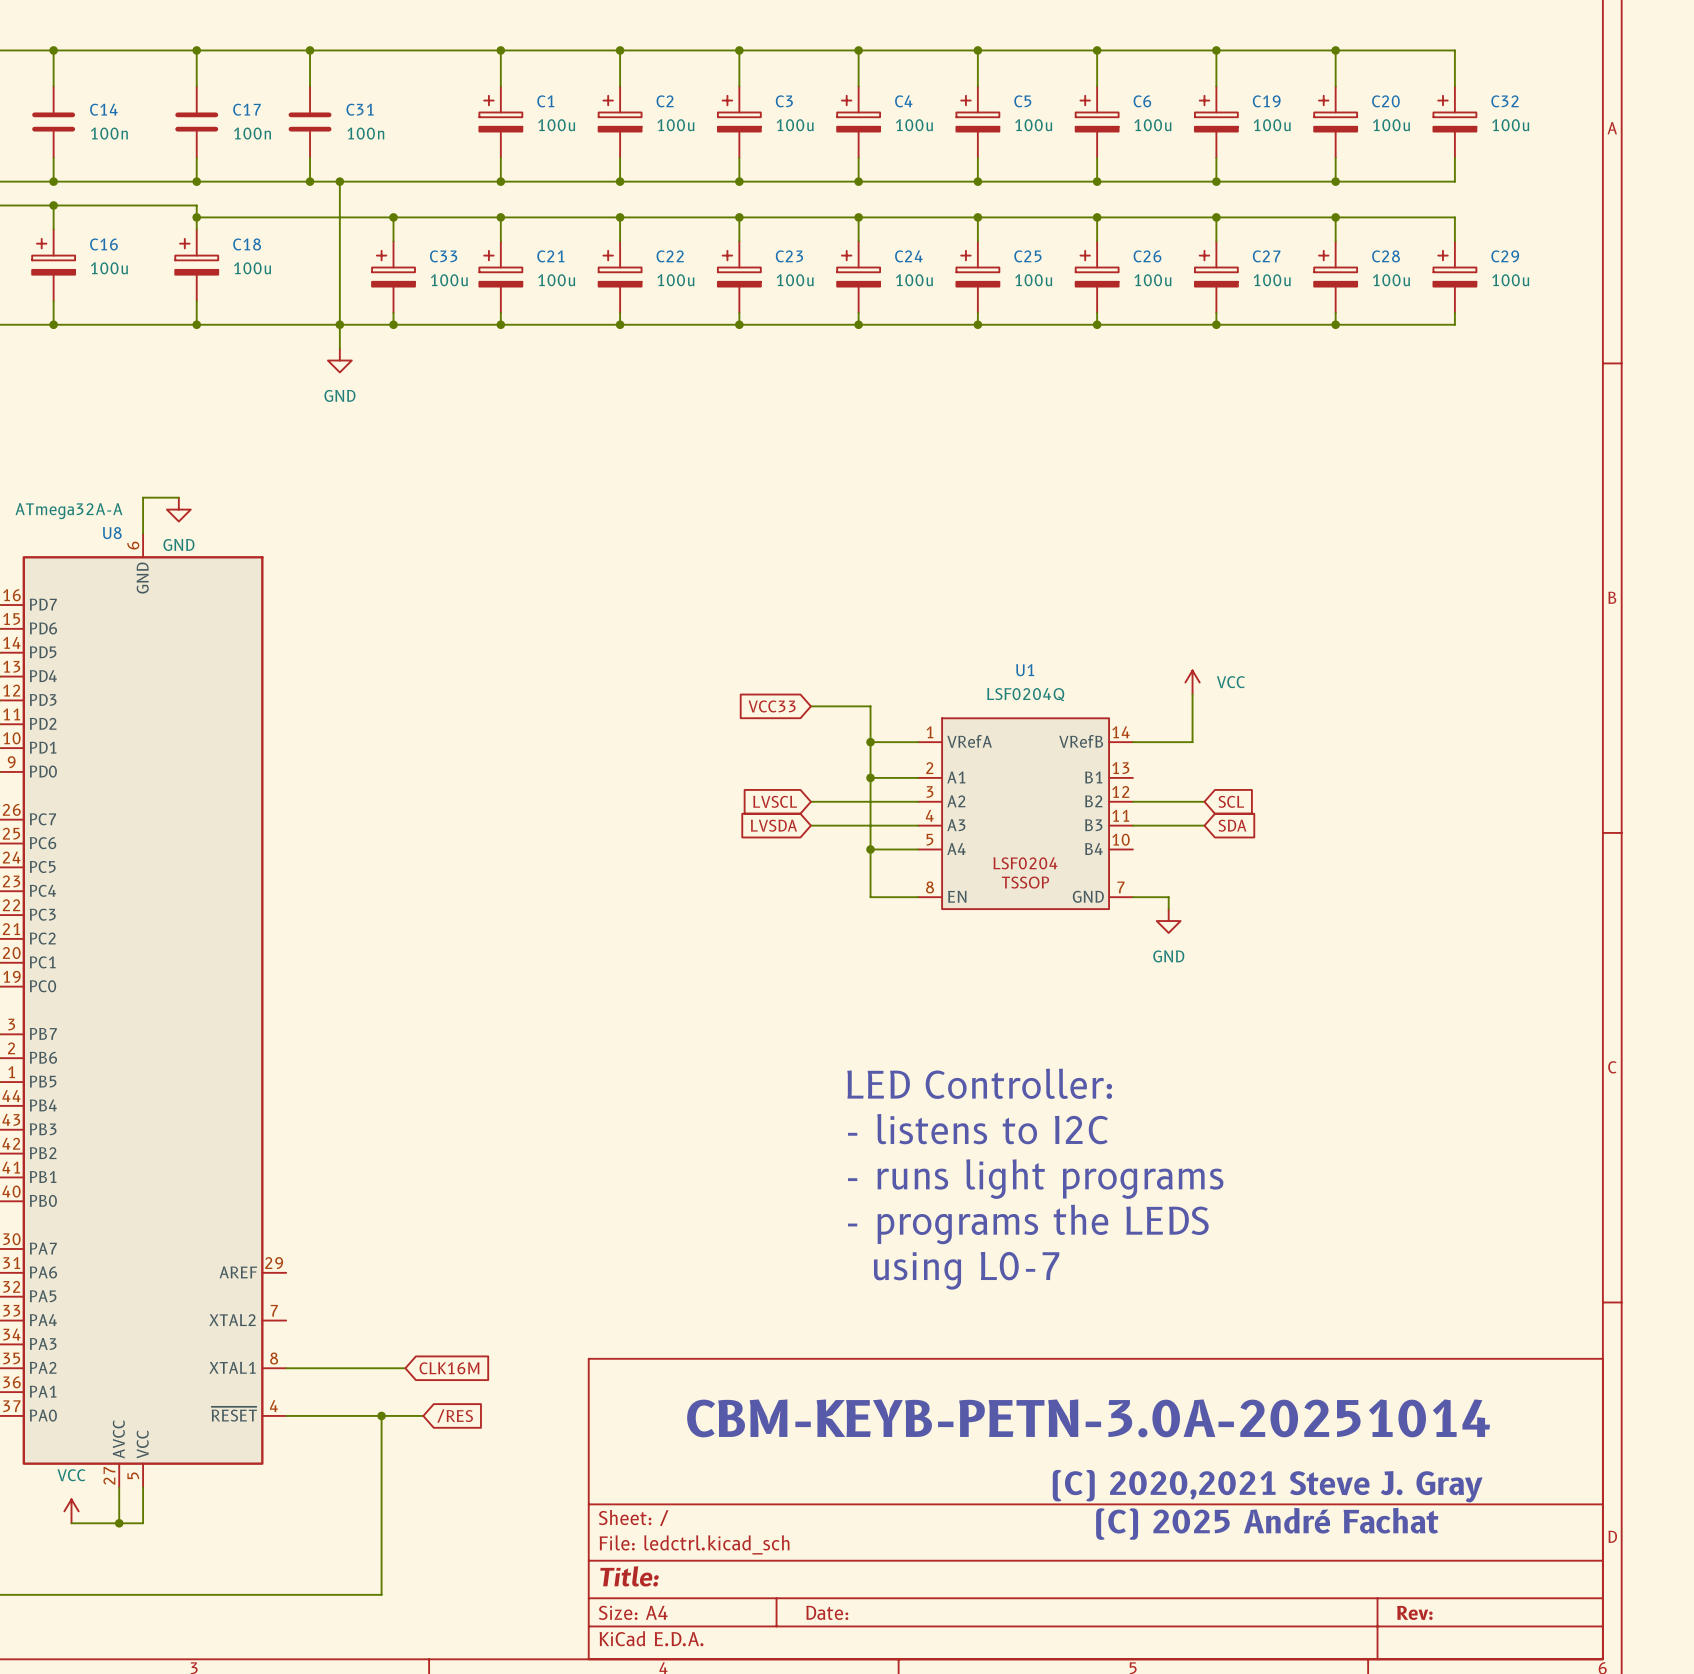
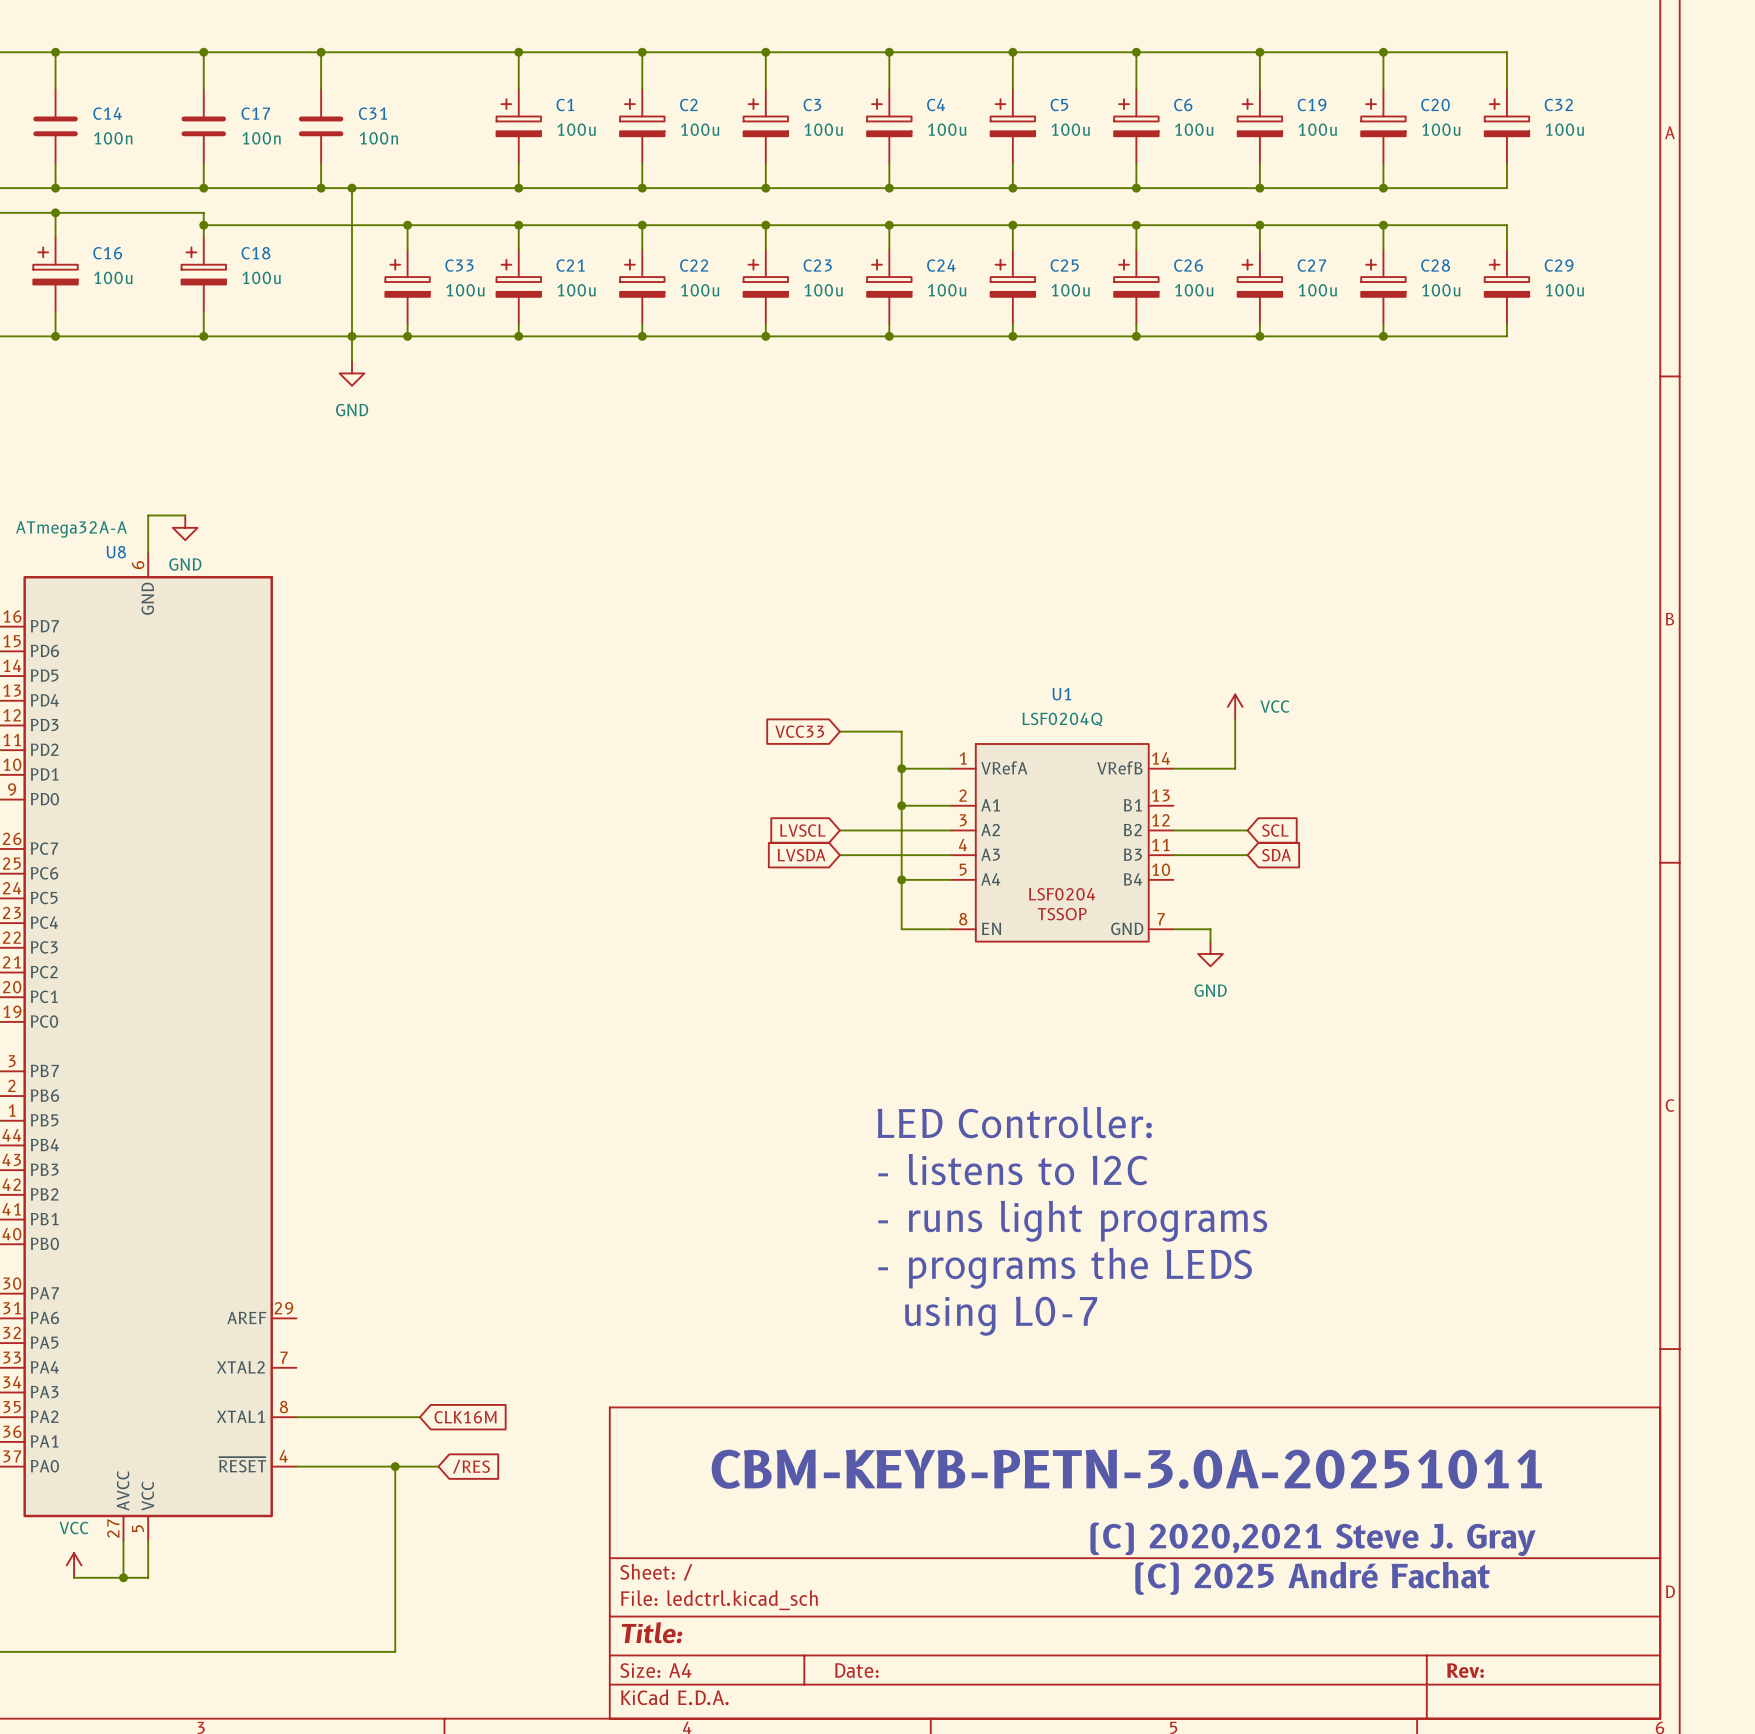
text: CBM-KEYB-PETN-3.0A-20251014 (1088, 1418) -> CBM-KEYB-PETN-3.0A-20251011 (1126, 1469)

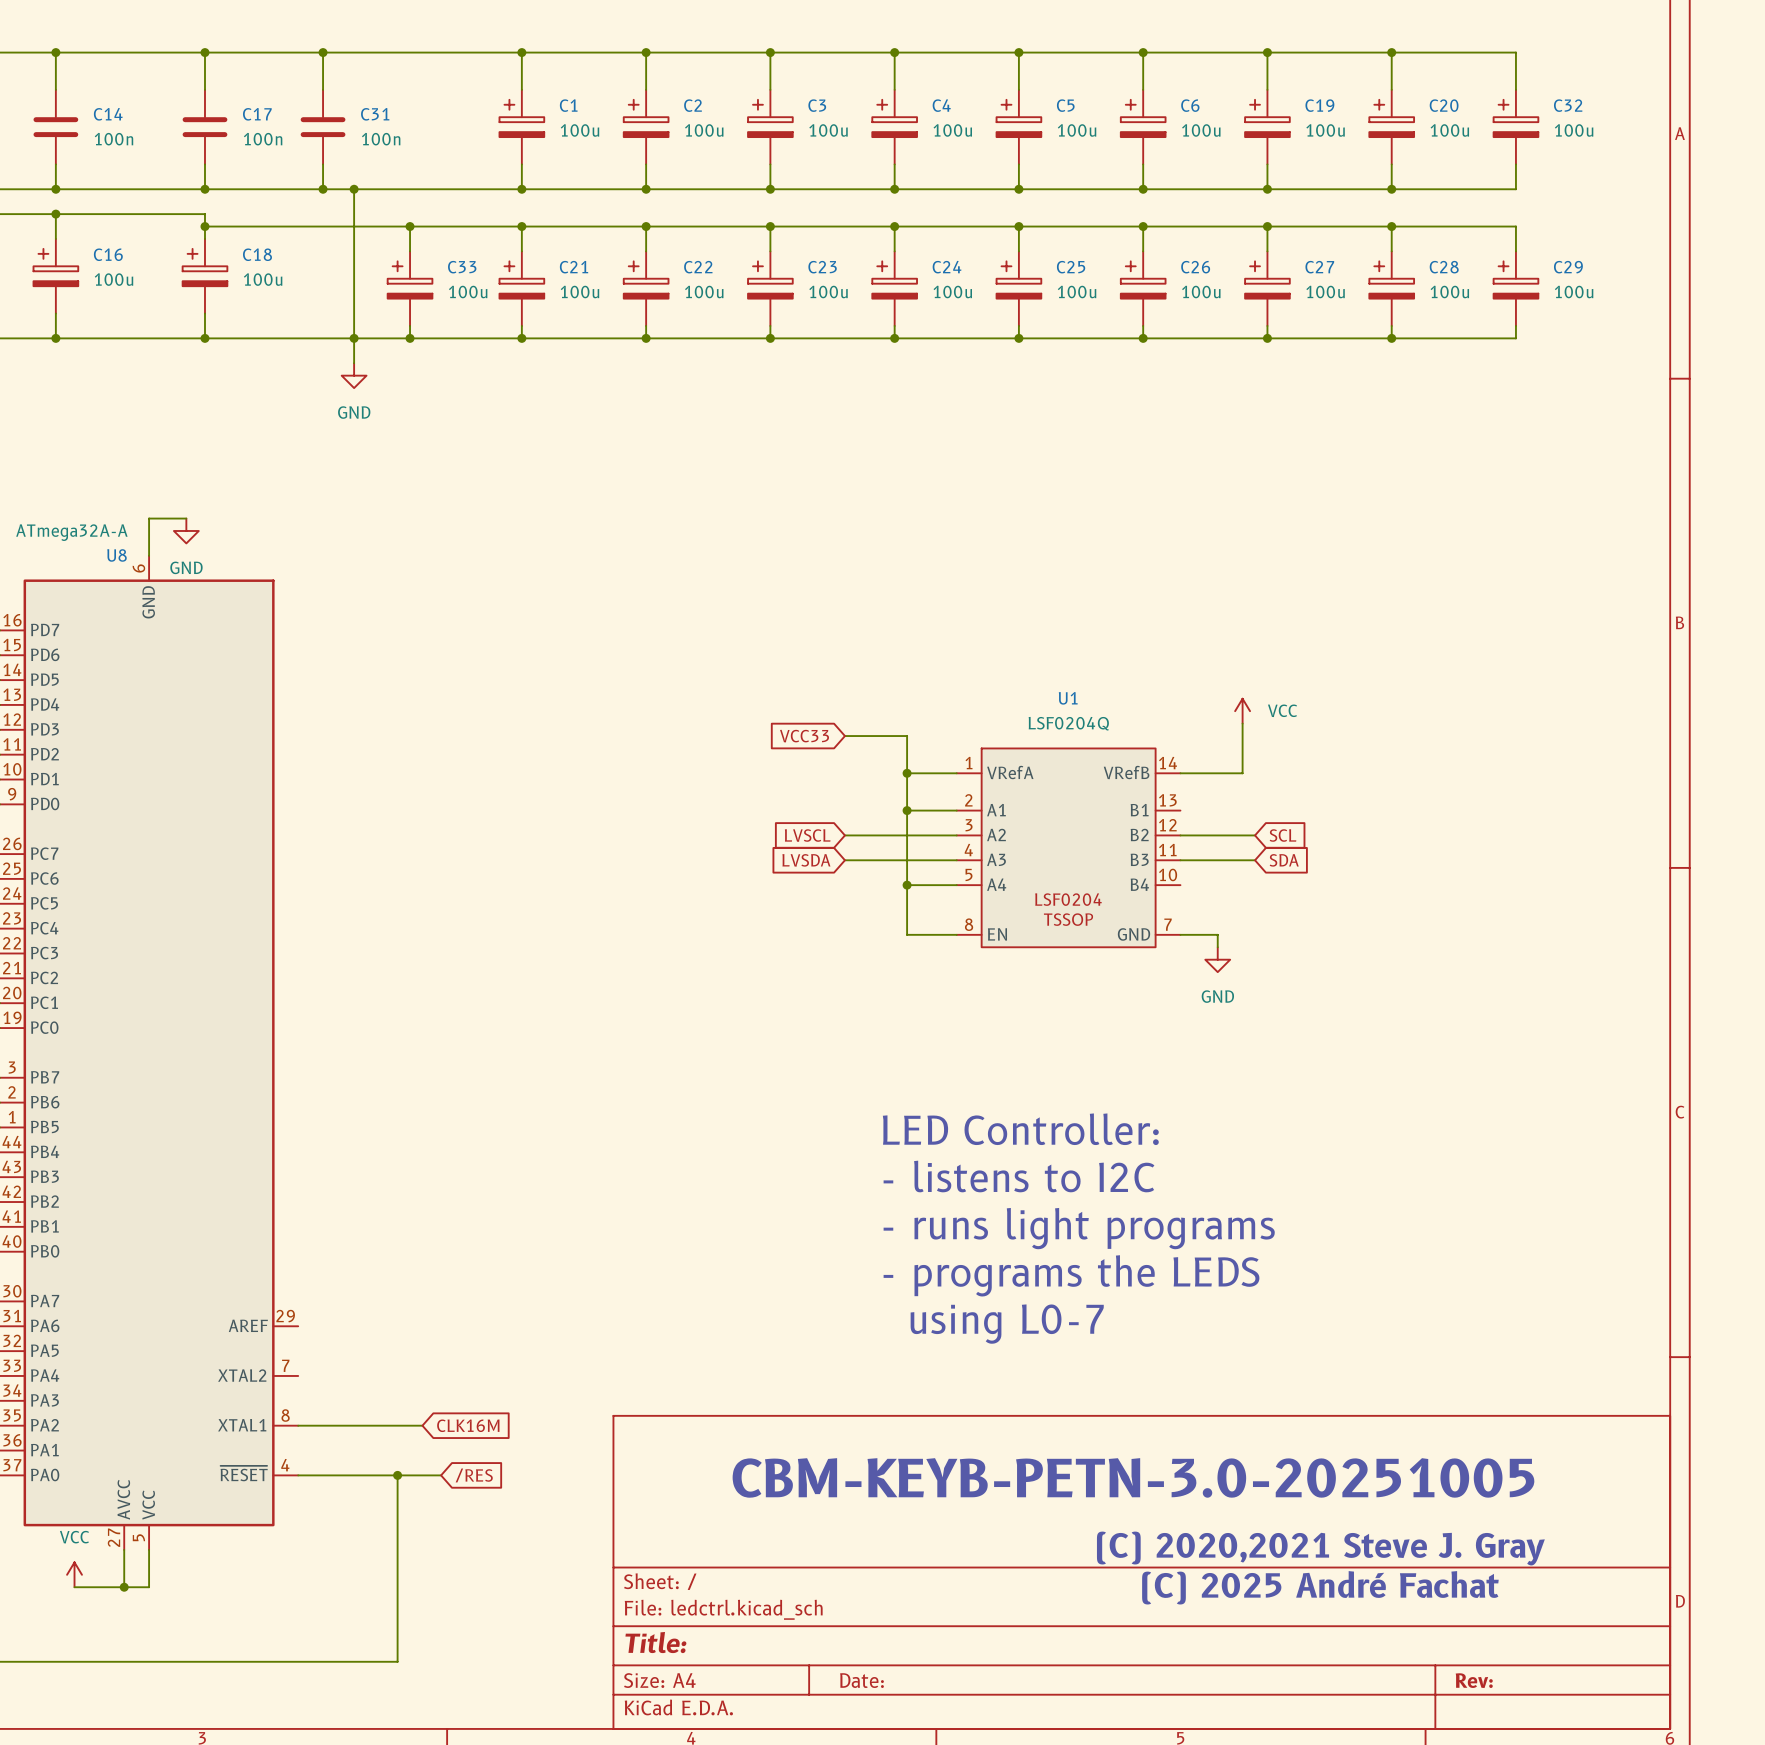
text: CBM-KEYB-PETN-3.0A-20251011 (1126, 1469) -> CBM-KEYB-PETN-3.0-20251005 (1133, 1477)

